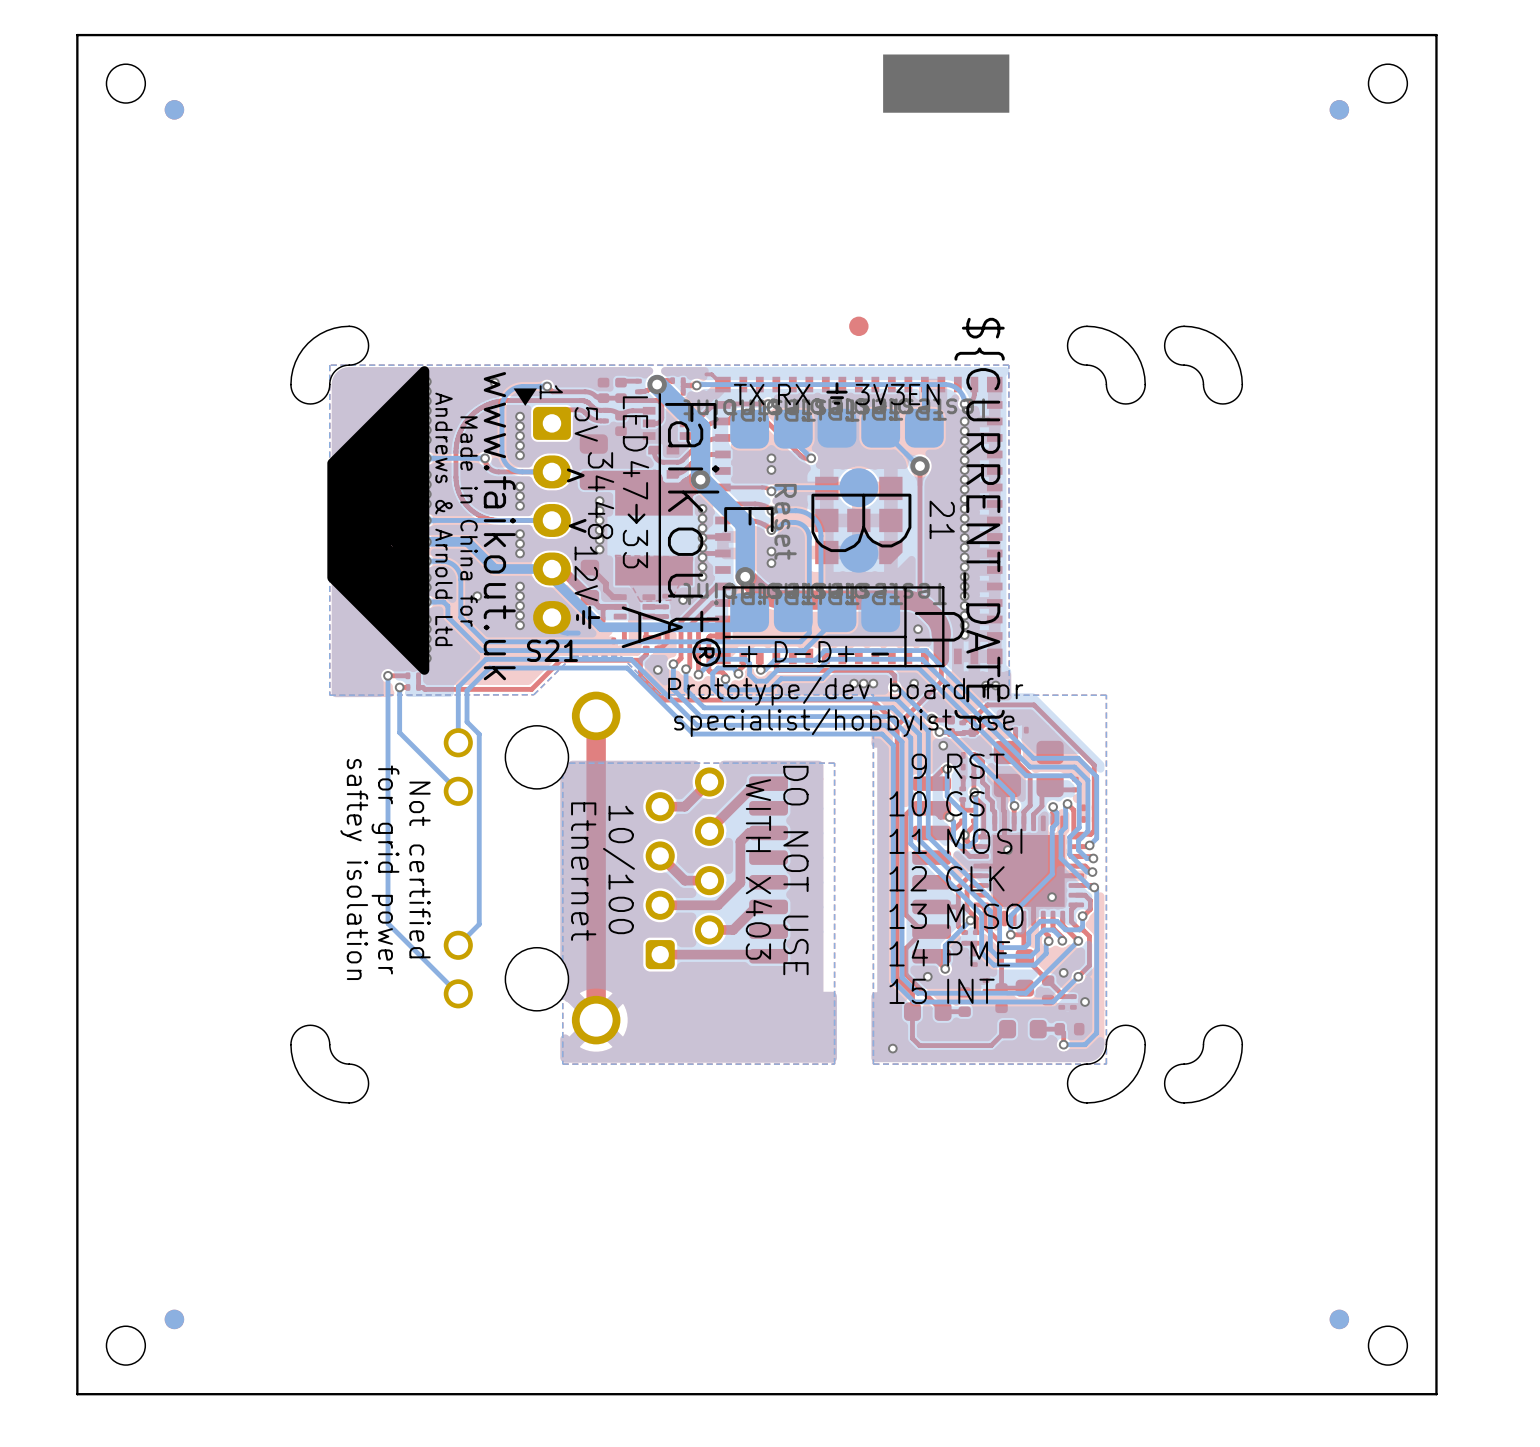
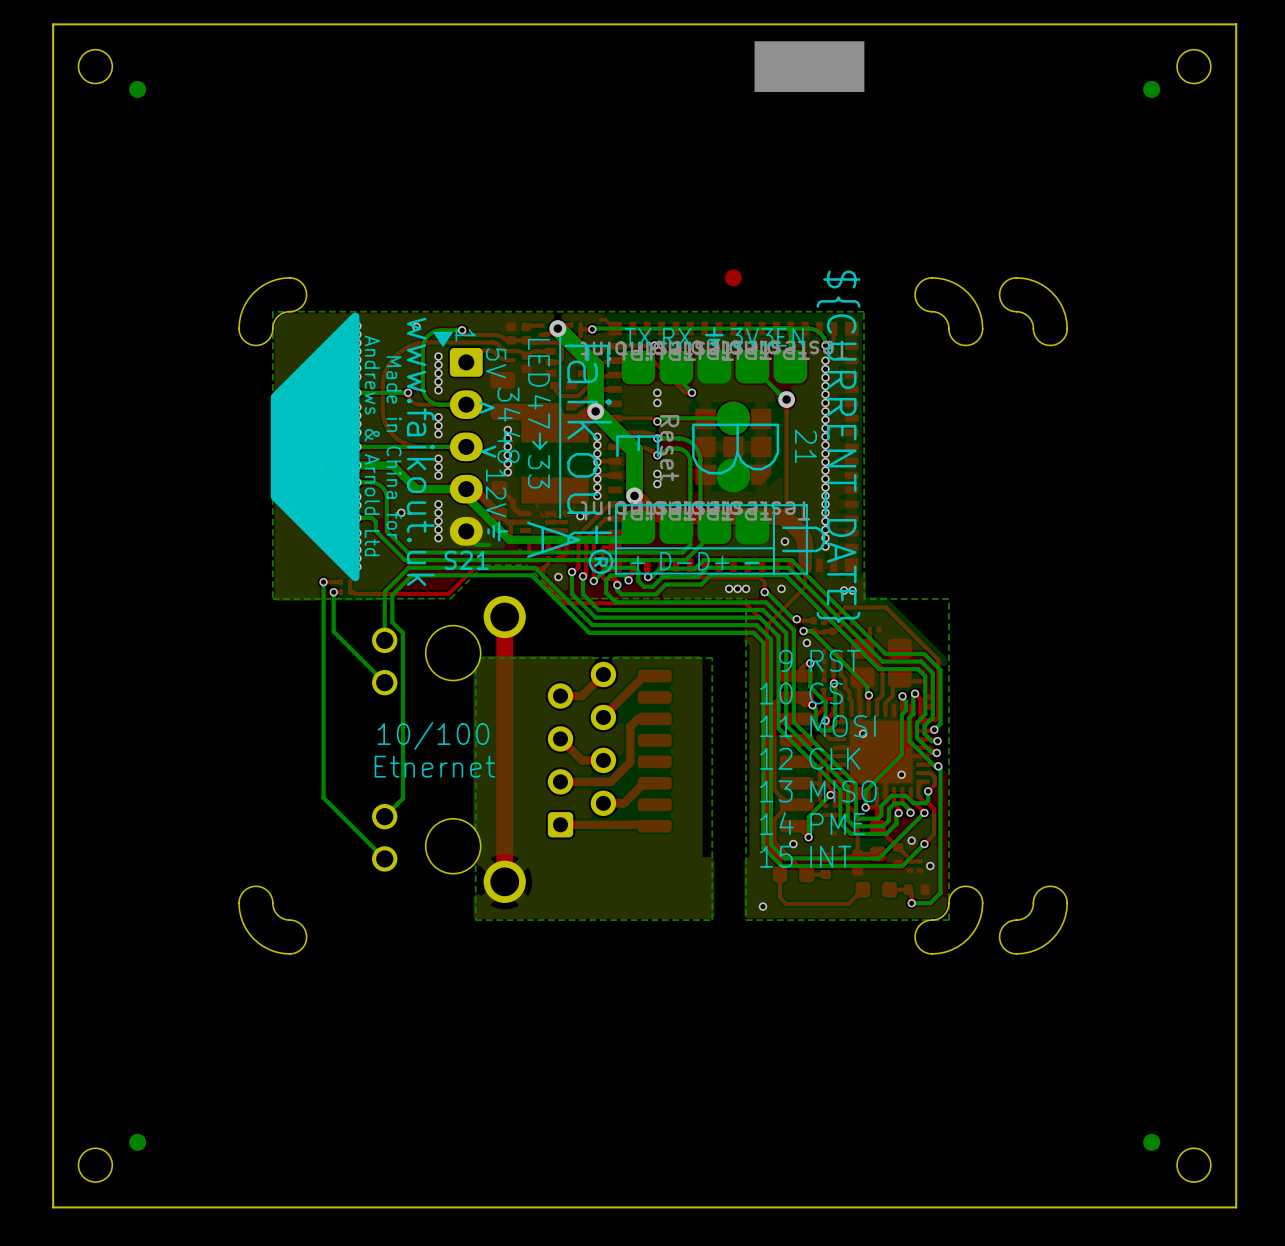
text: Prototype/dev board for (845, 691) -> none
text: specialist/hobbyist use (844, 722) -> none
text: saftey isolation (354, 869) -> none
text: for grid power (385, 869) -> none
text: Not certified (419, 869) -> none
text rotation: 0° (618, 869) -> 90° counterclockwise (433, 735)
text: WITH X403 (758, 869) -> none
text: DO NOT USE (795, 870) -> none
text rotation: 0° (583, 871) -> 90° counterclockwise (434, 766)

